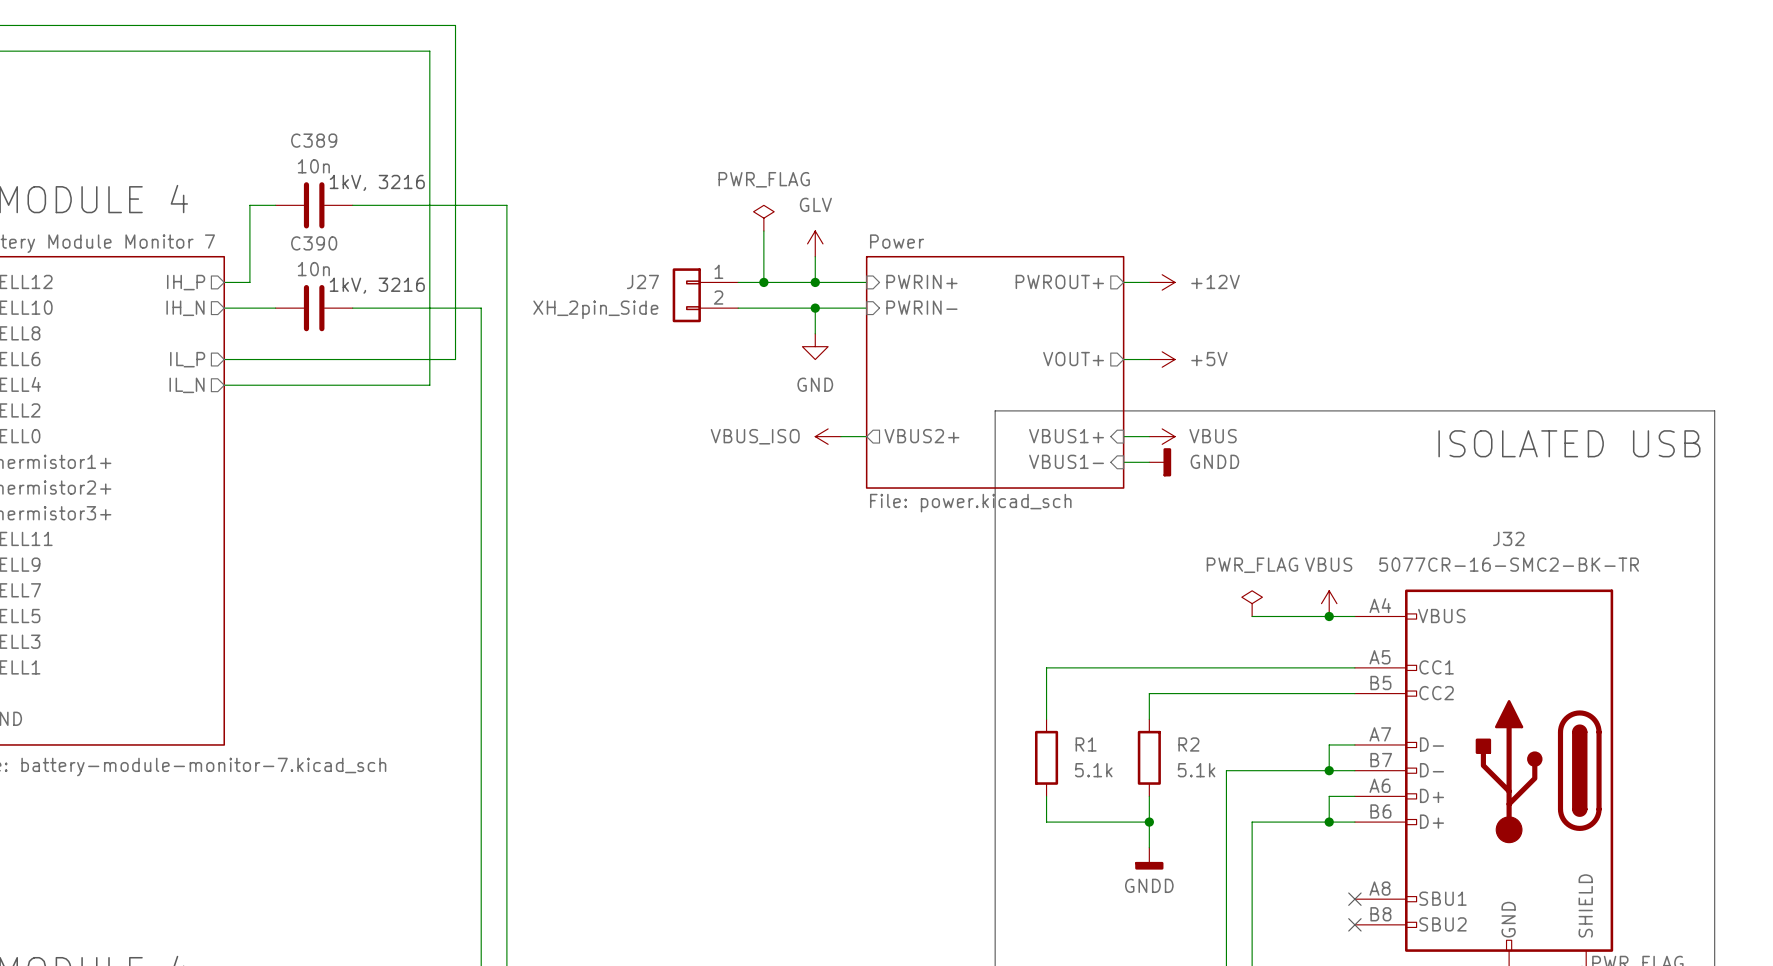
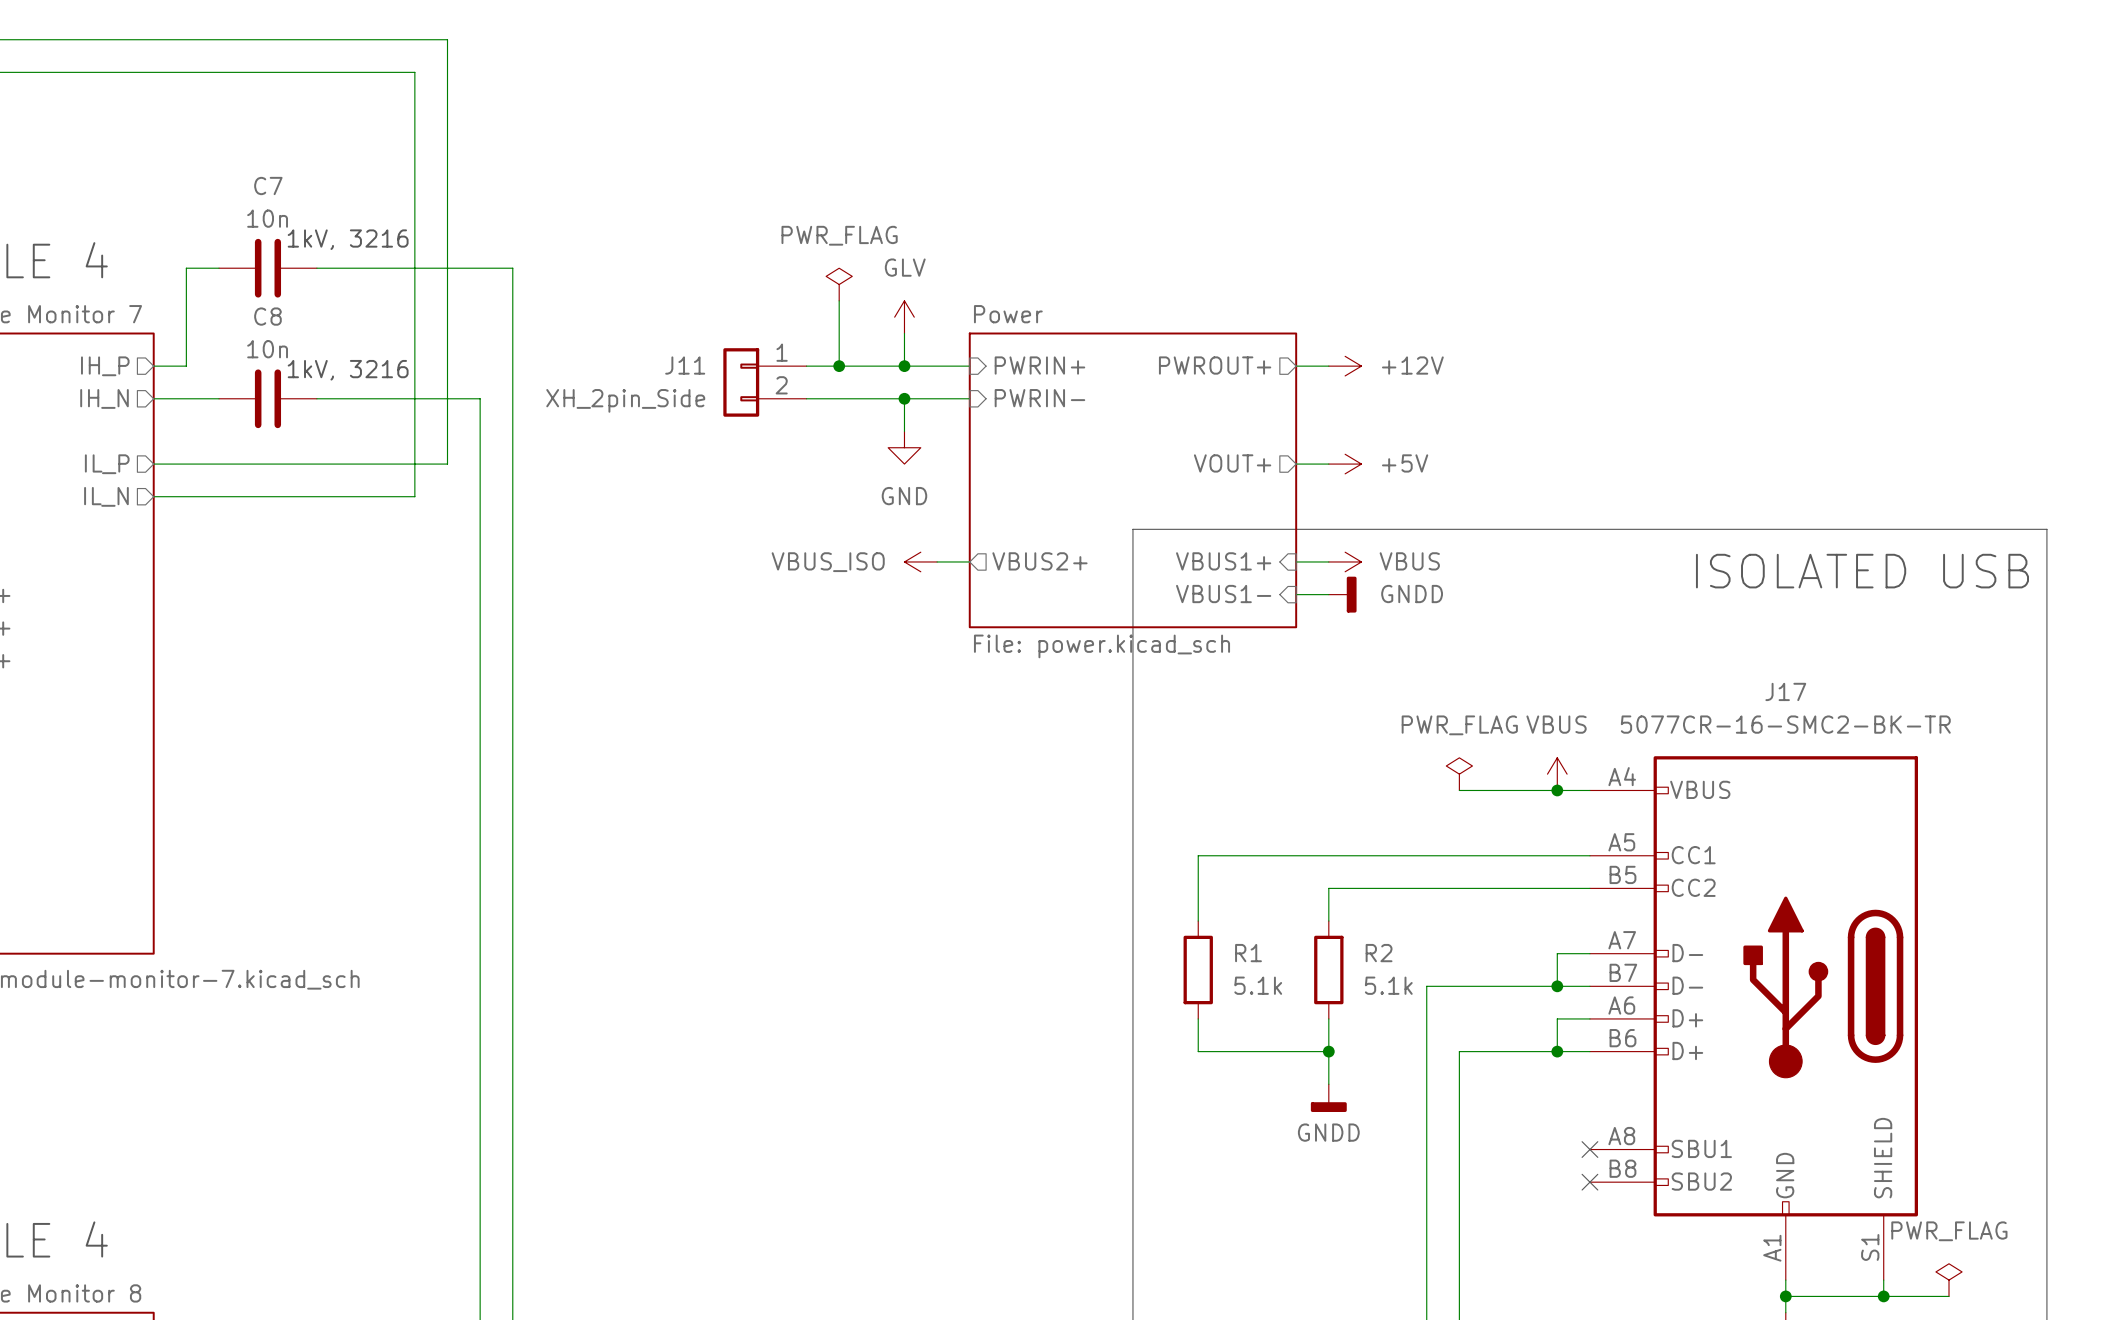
C389 name: C389 (314, 140) -> C7 (268, 186)
C390 name: C390 (314, 243) -> C8 (267, 316)
J27 name: J27 (642, 281) -> J11 (685, 365)
J32 name: J32 (1508, 538) -> J17 (1785, 691)

